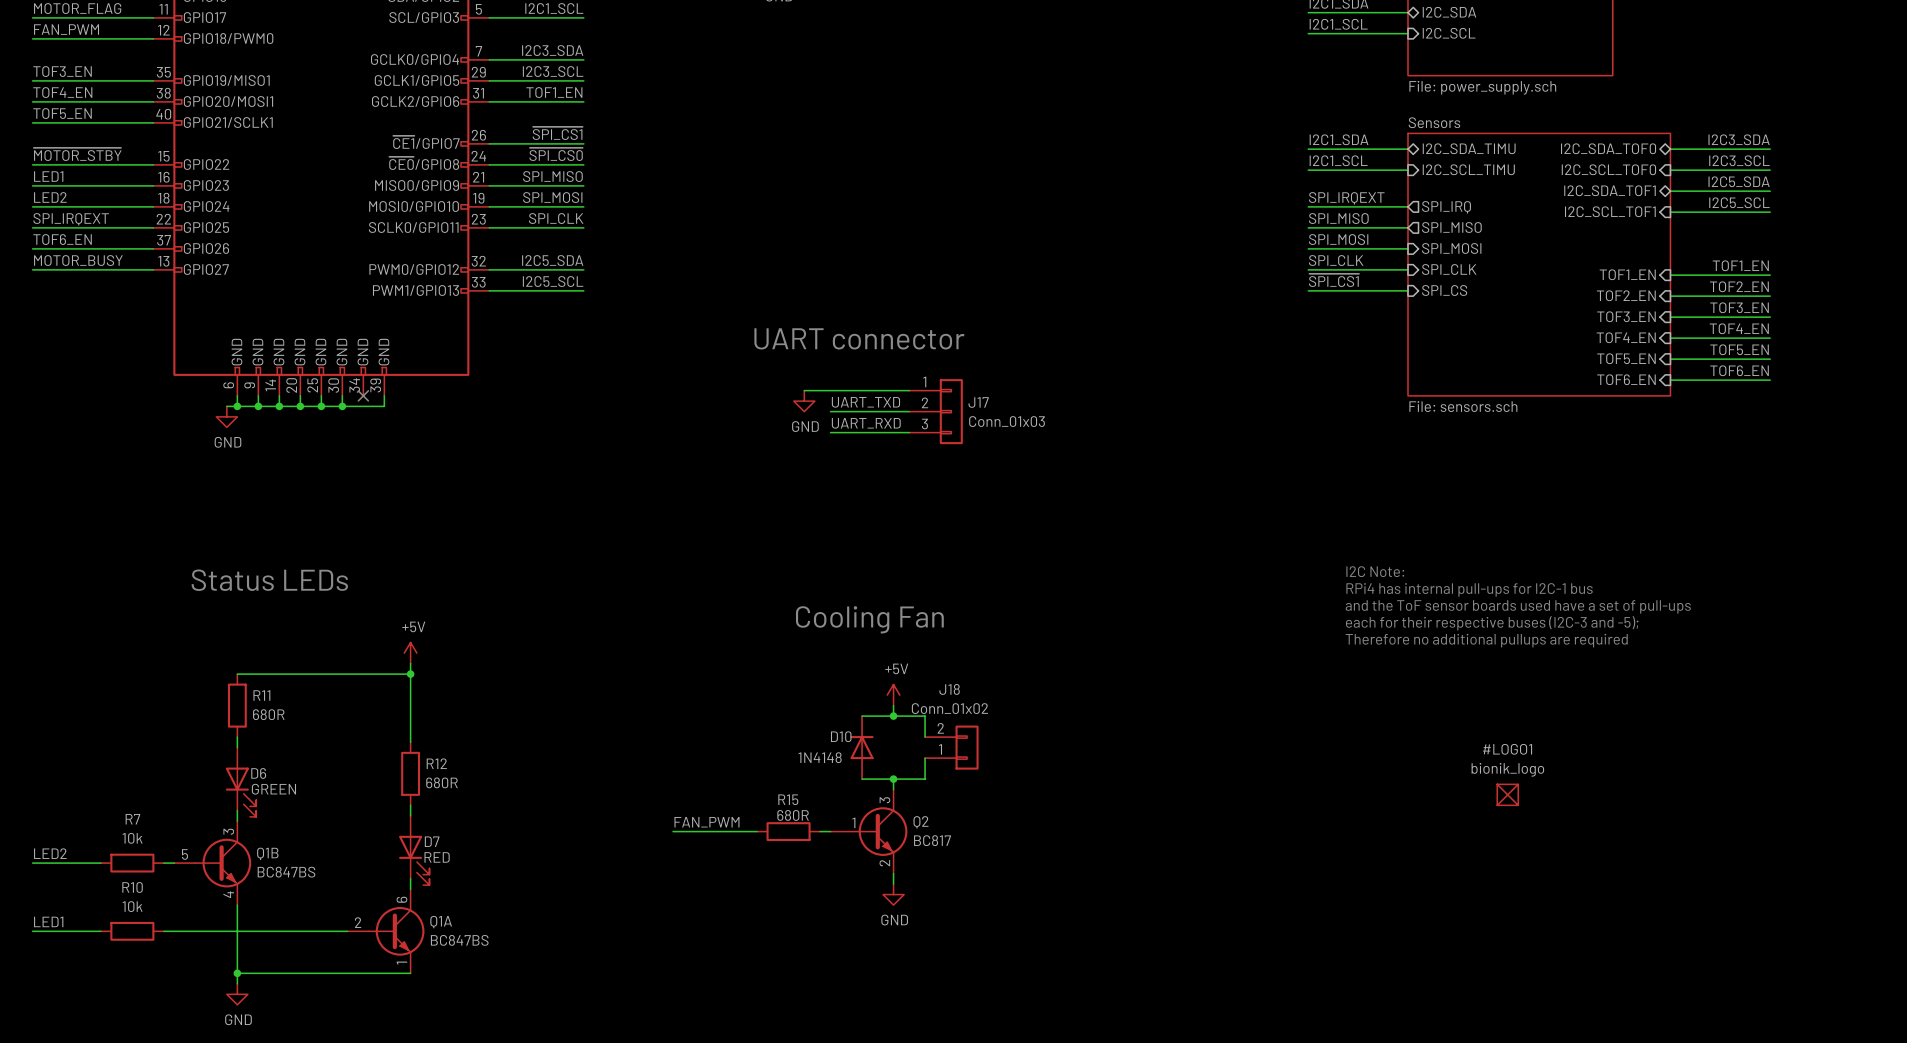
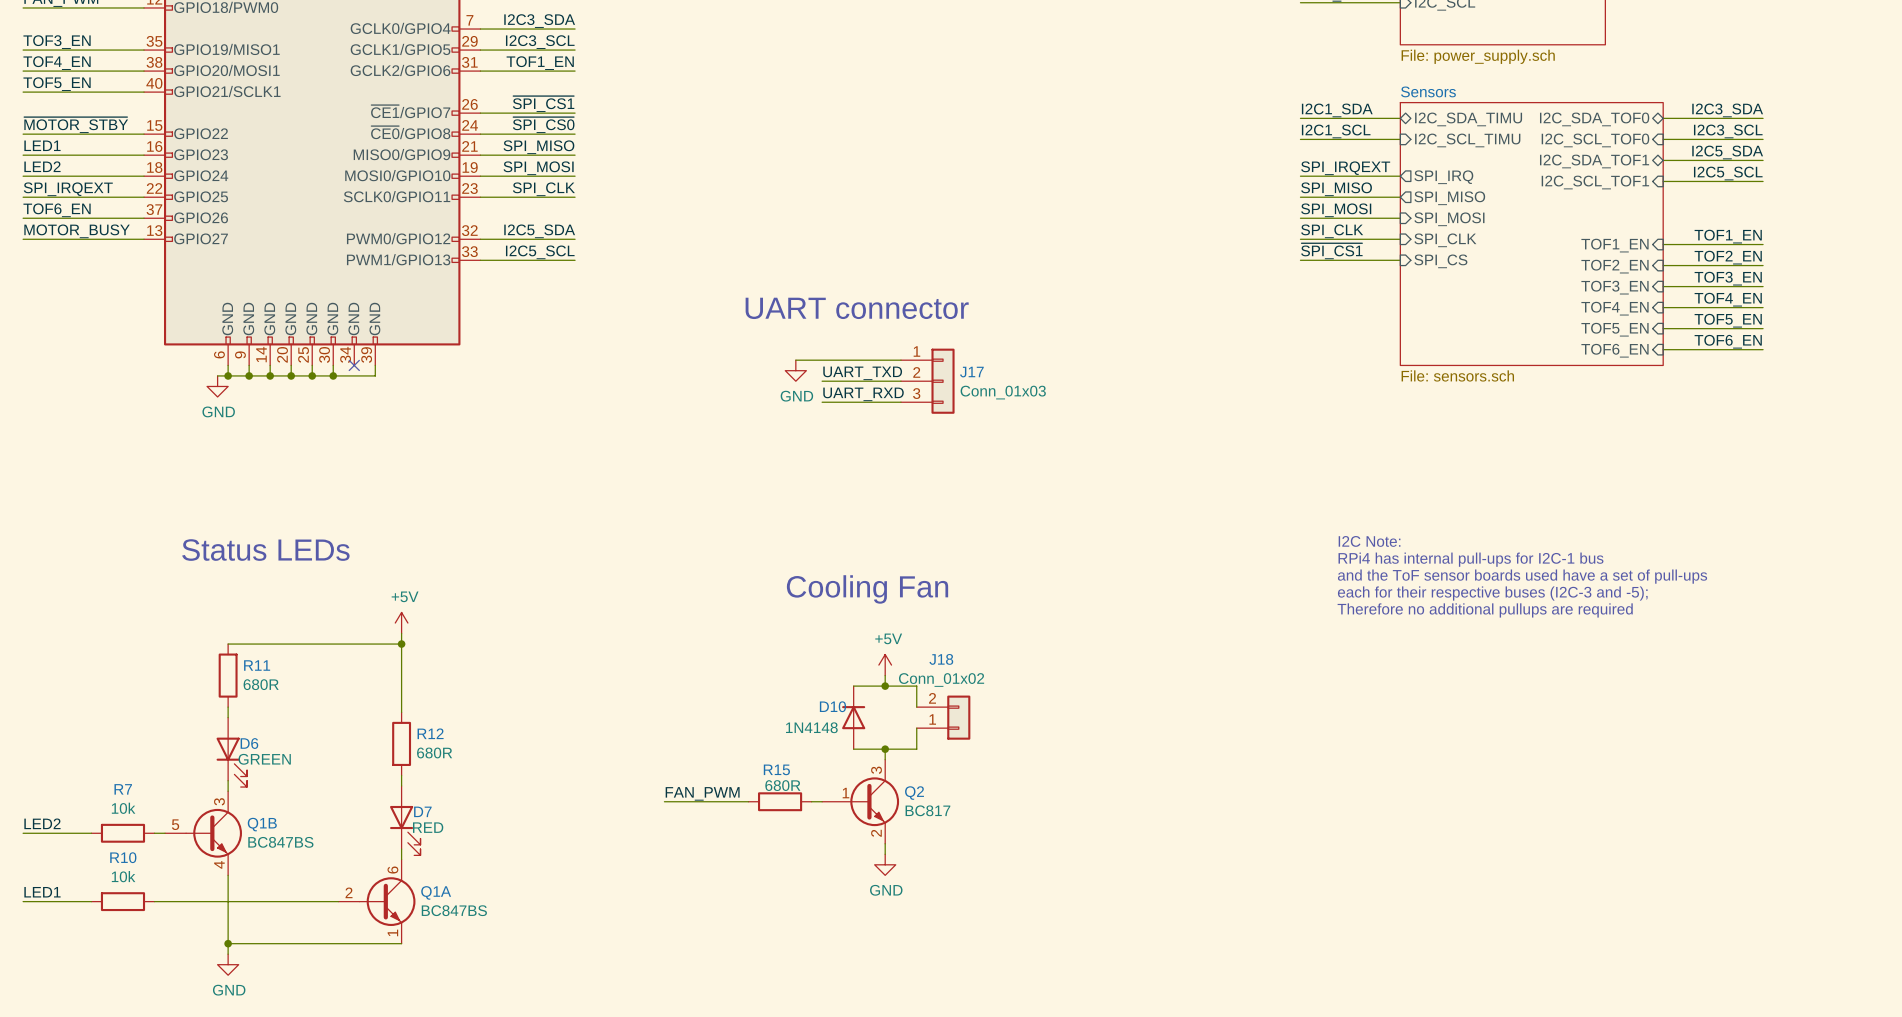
#LOGO1: bionik_logo (1507, 794) -> none

